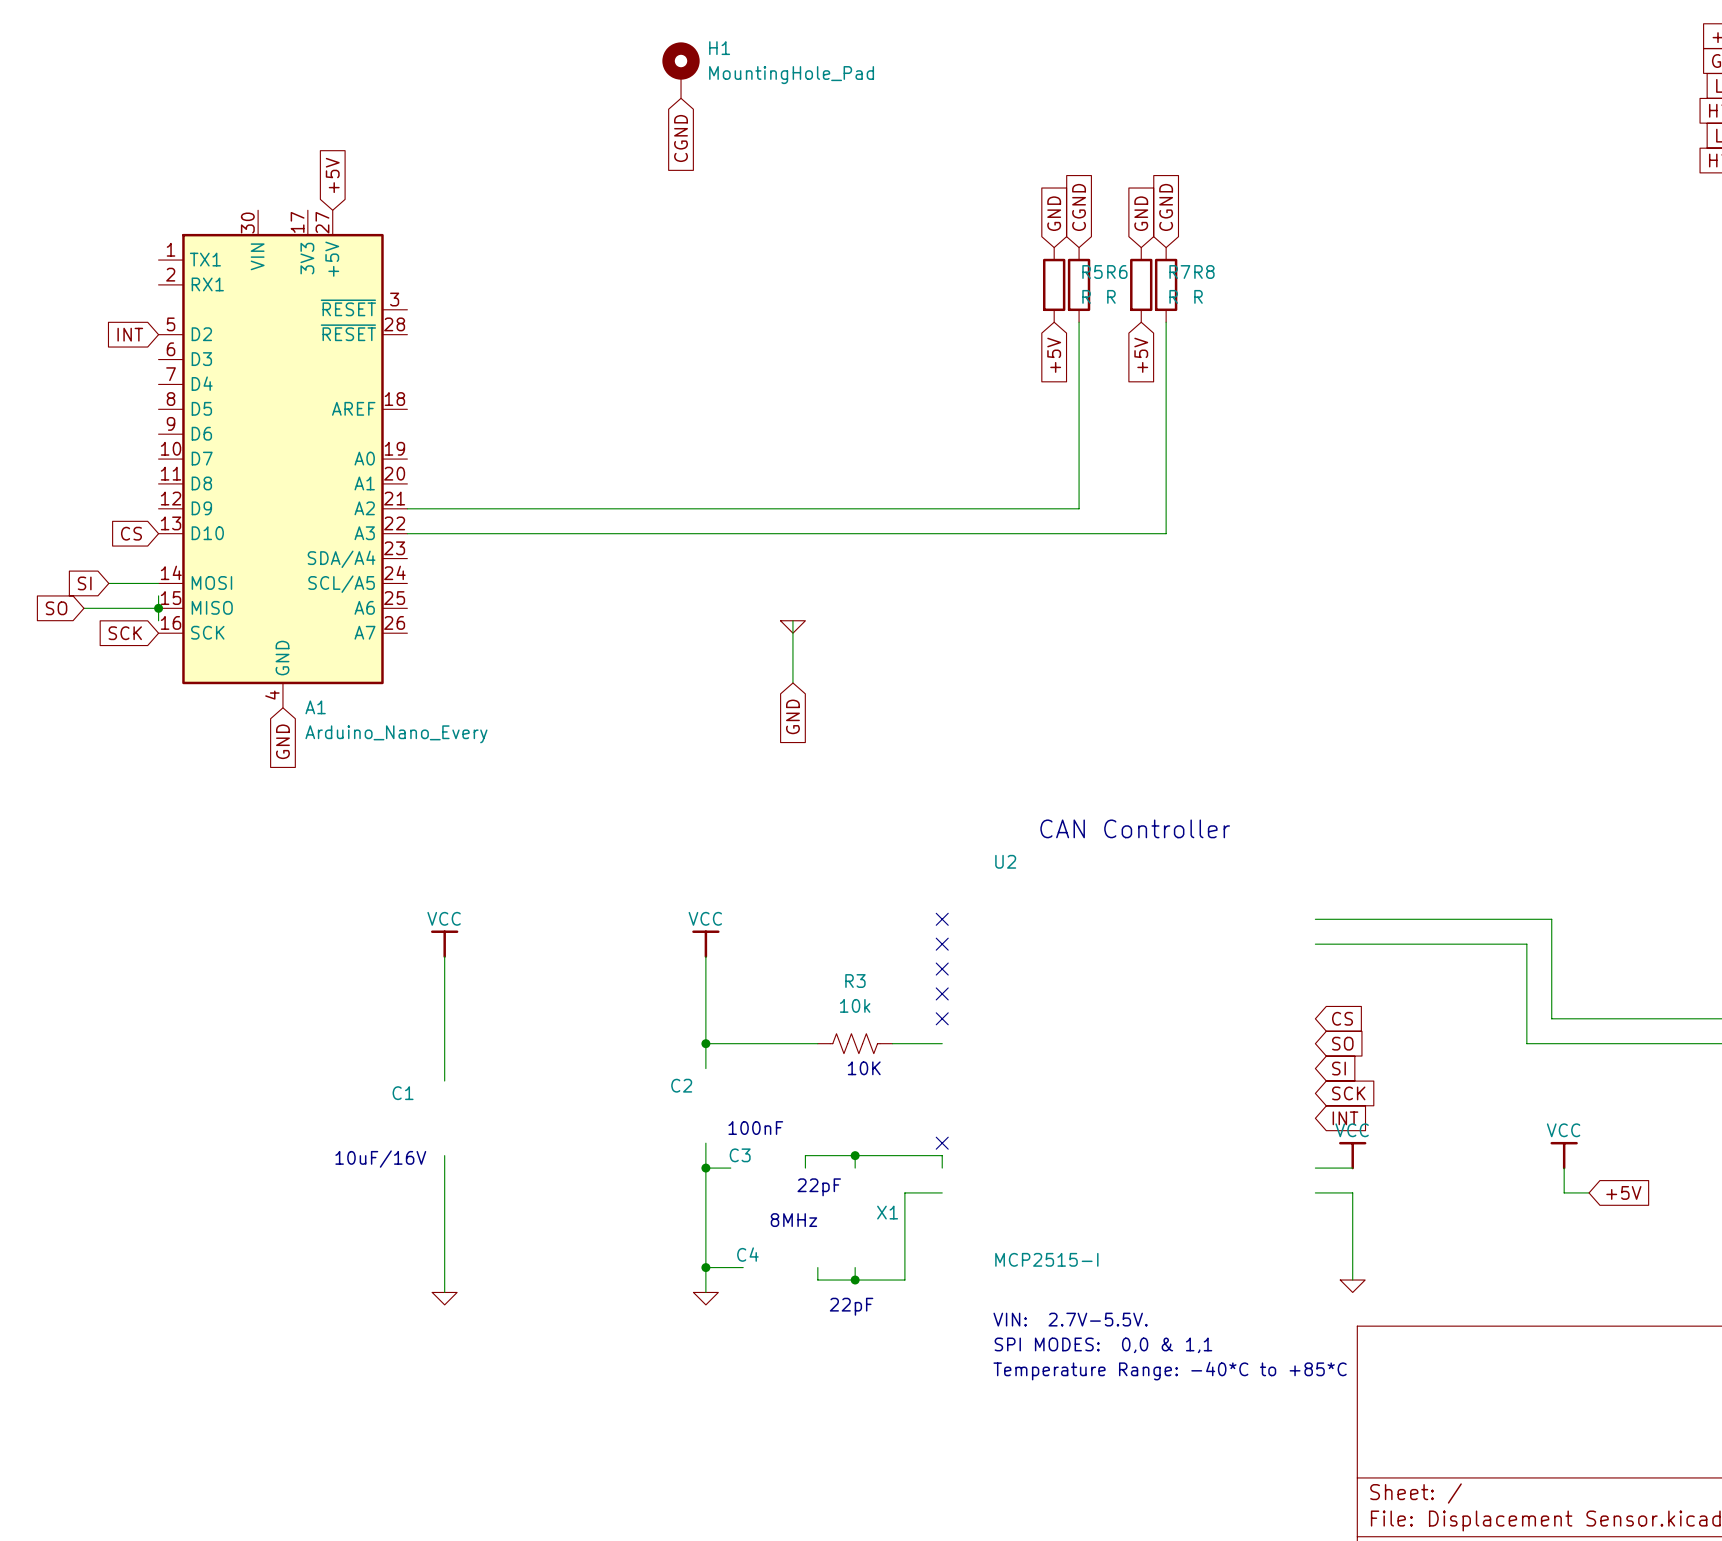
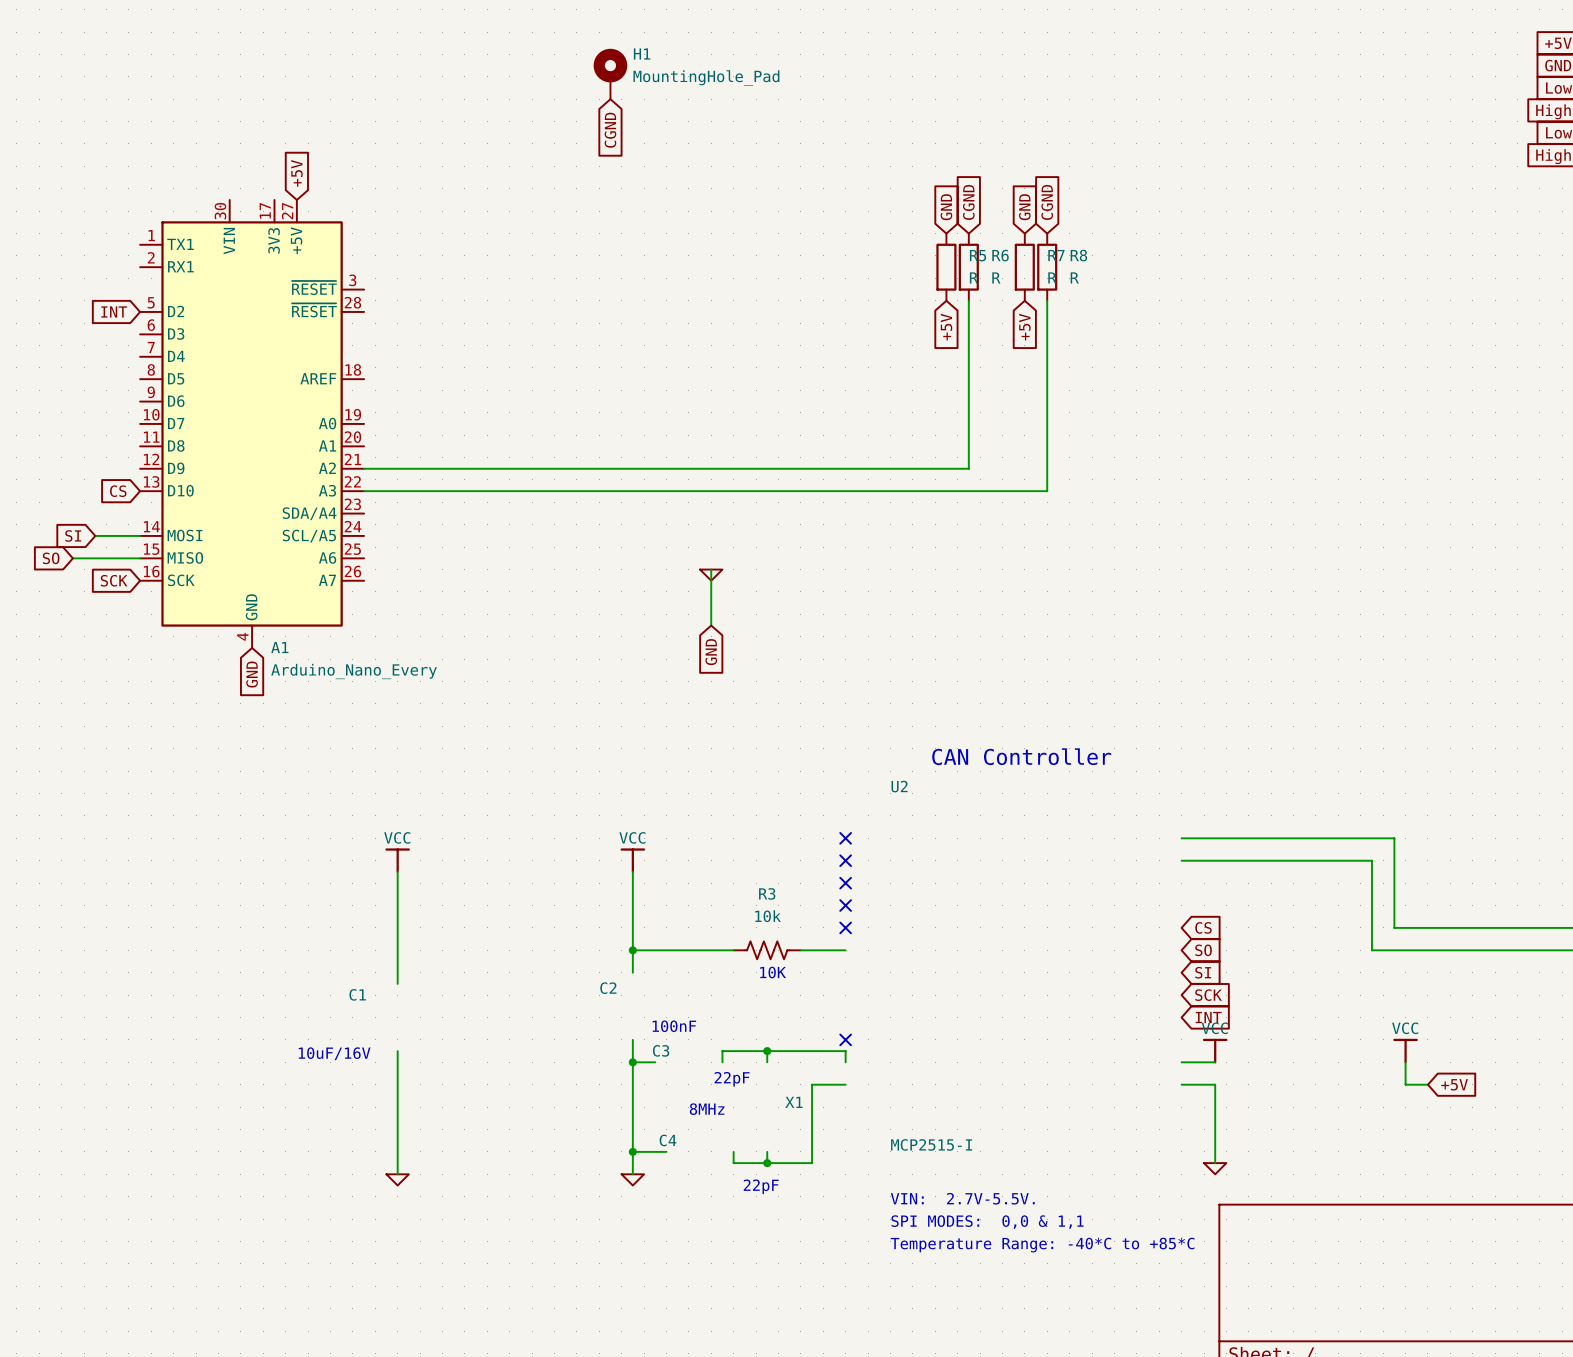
wire: (158, 595) (158, 620) -> none
junction: (158, 608) -> none

